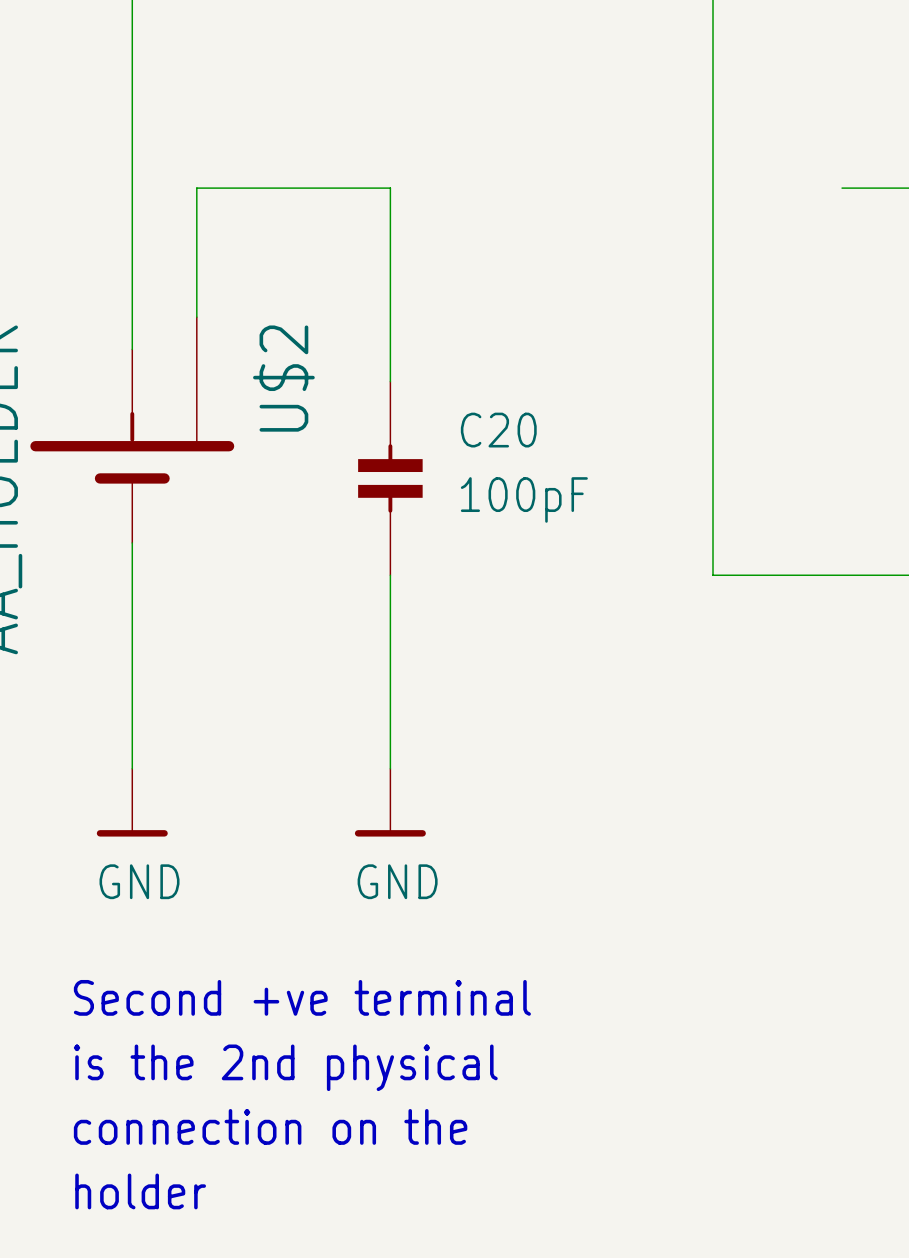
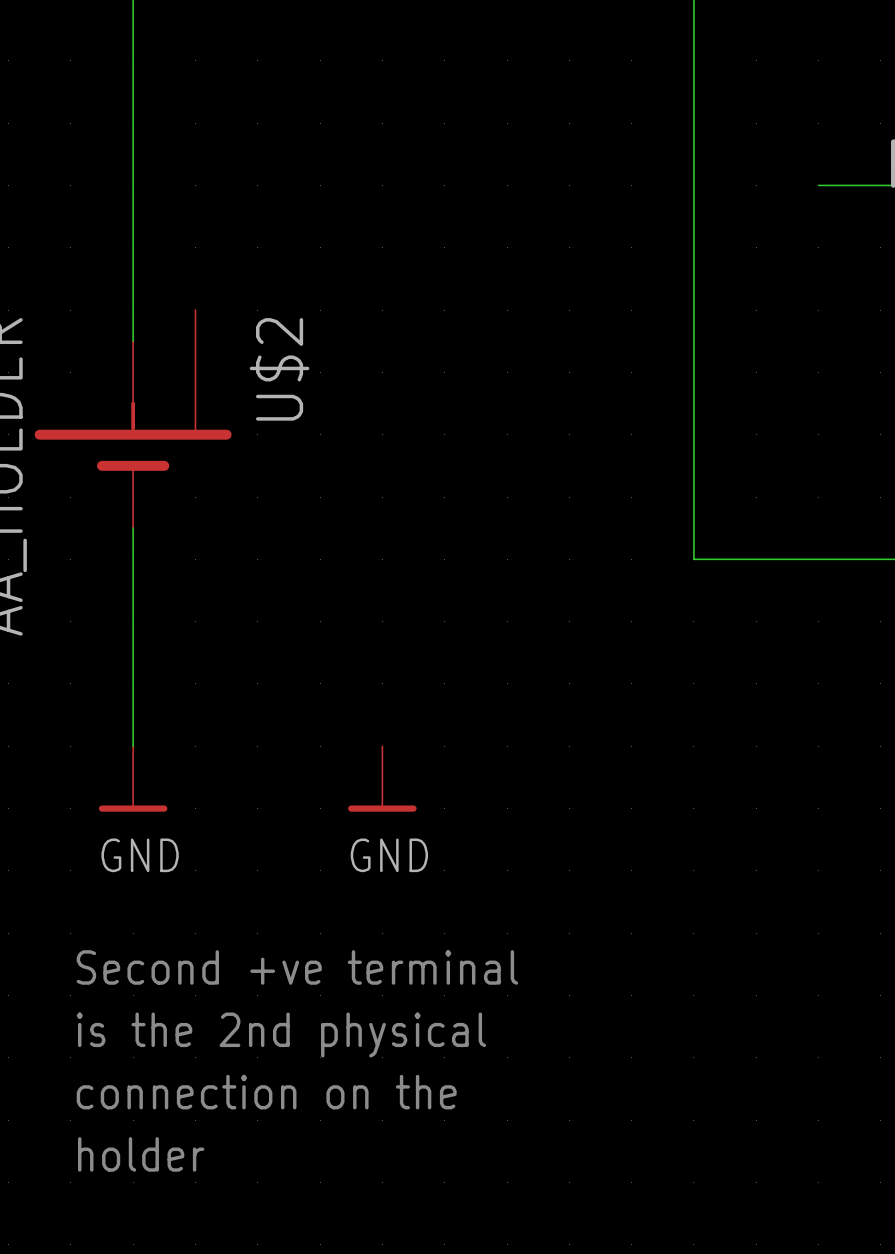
wire: (196, 317) (196, 188) (390, 188) (390, 381) -> none
C20: 100pF (390, 478) -> none
wire: (390, 575) (390, 768) -> none

